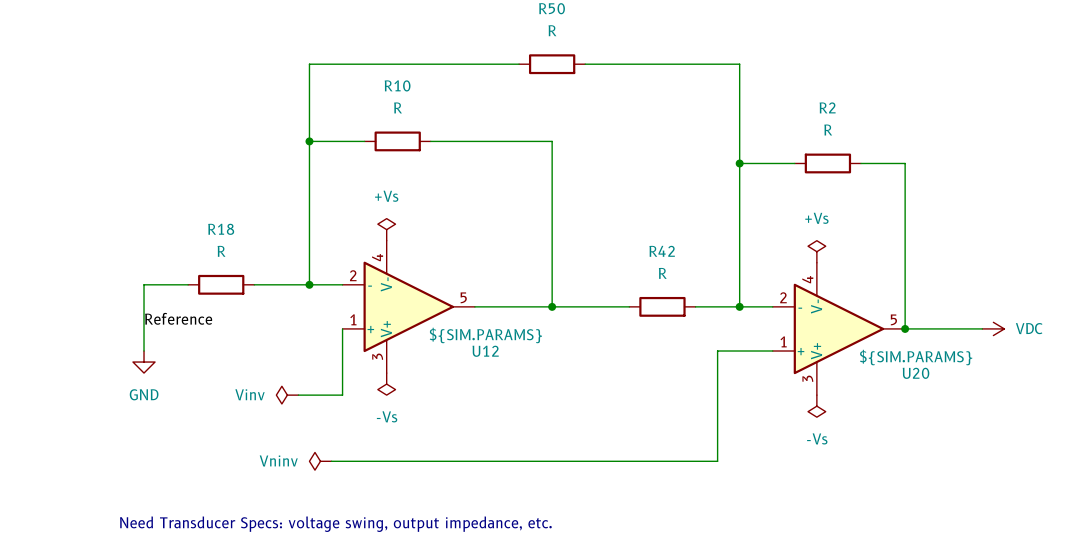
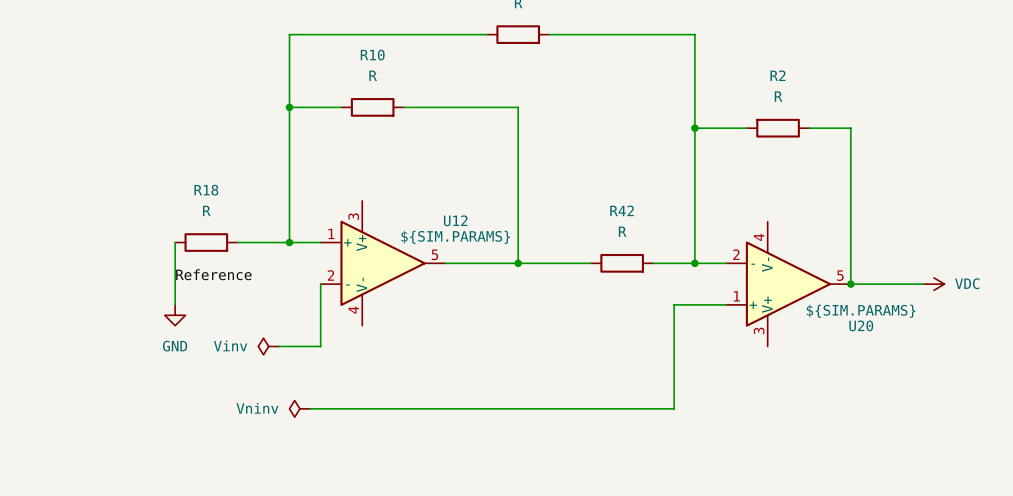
power symbol: +Vs (386, 229) -> none
power symbol: +Vs (816, 251) -> none
wire: (188, 284) (144, 284) (144, 351) -> (175, 242) (175, 304)
U12 flip: as is (408, 306) -> up-down (383, 263)
label position: Reference (178, 318) -> Reference (213, 274)
power symbol position: GND (144, 362) -> GND (175, 315)
power symbol: -Vs (386, 384) -> none
power symbol: -Vs (816, 406) -> none
text: Need Transducer Specs: voltage swing, output impedance, etc. (335, 524) -> none

